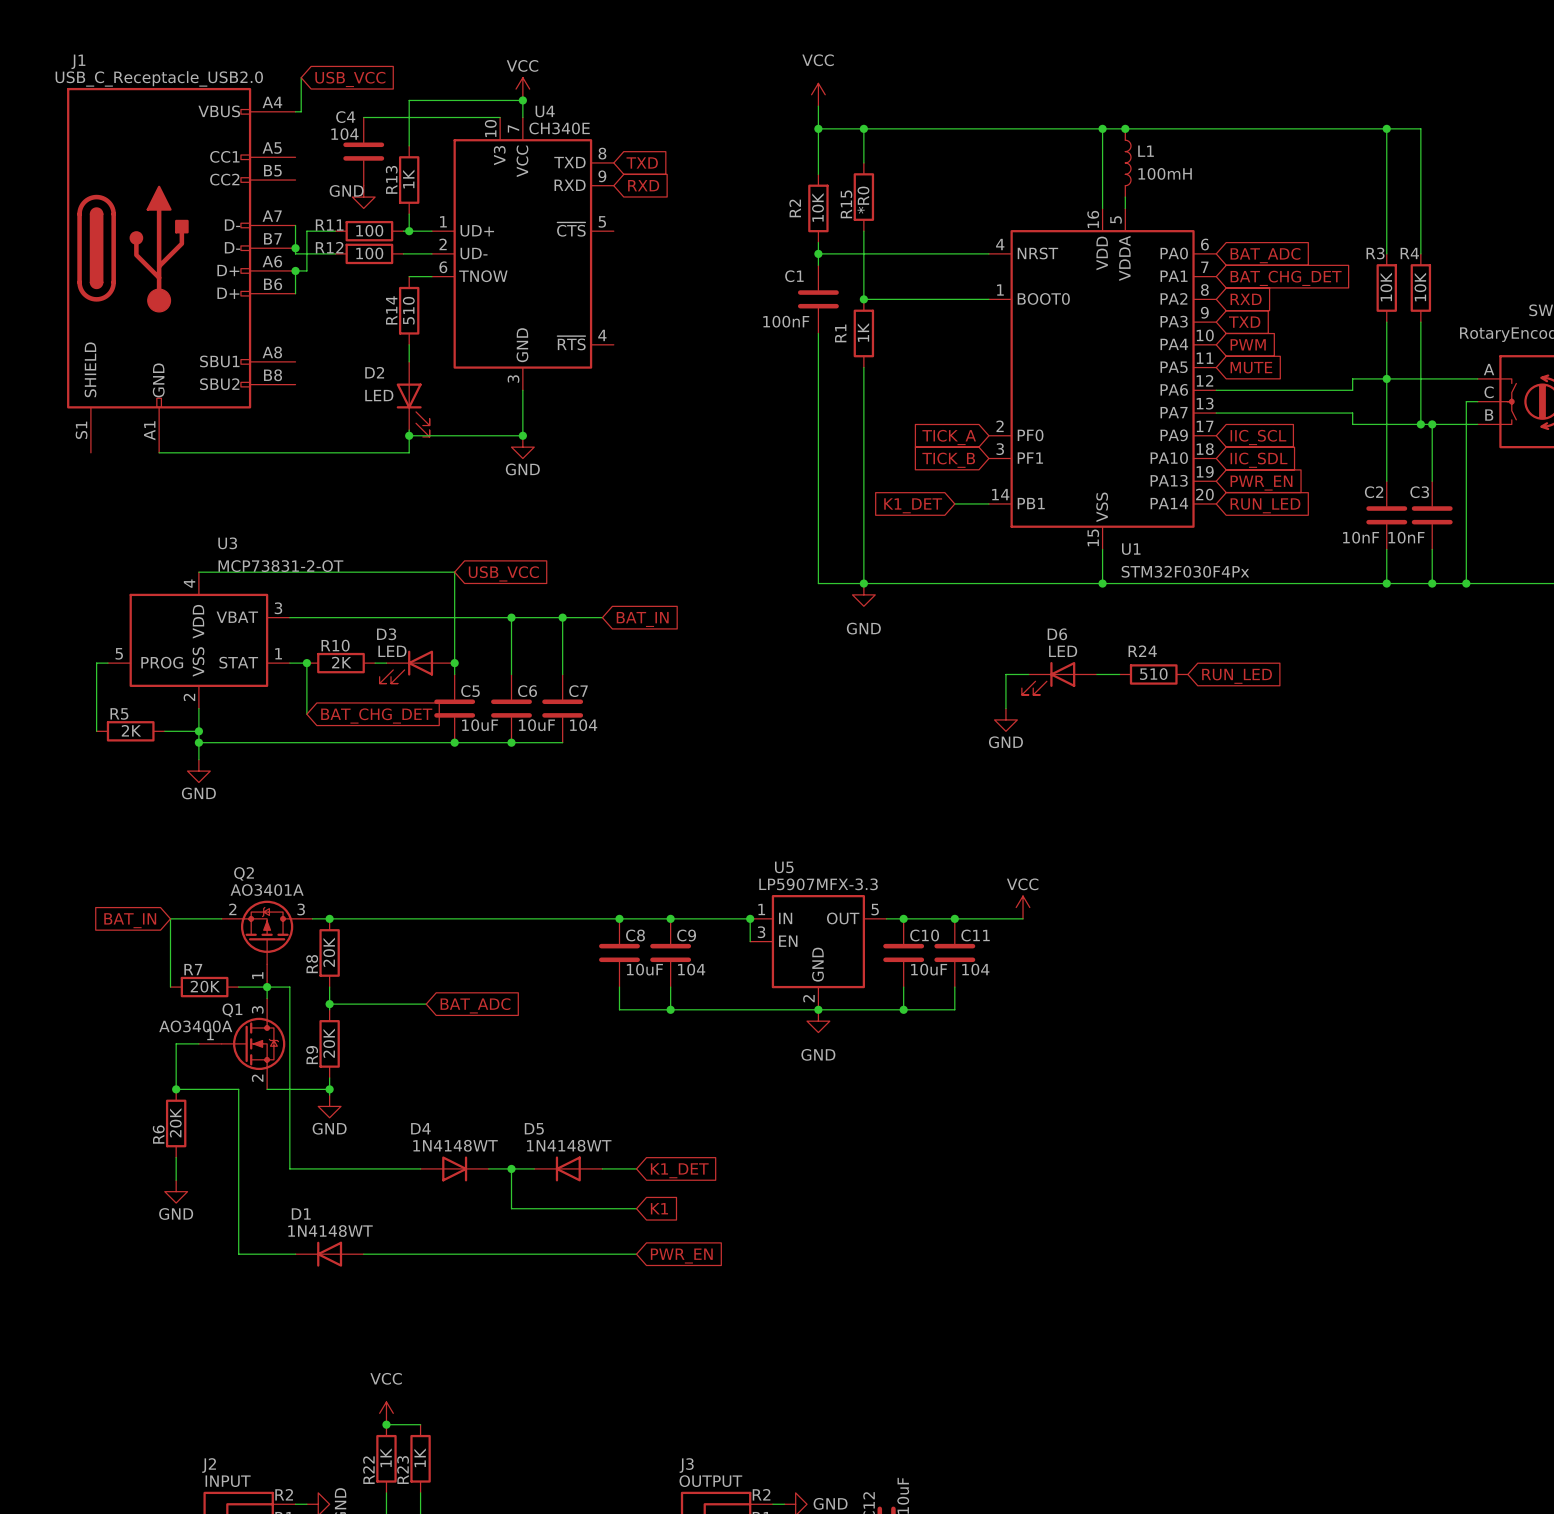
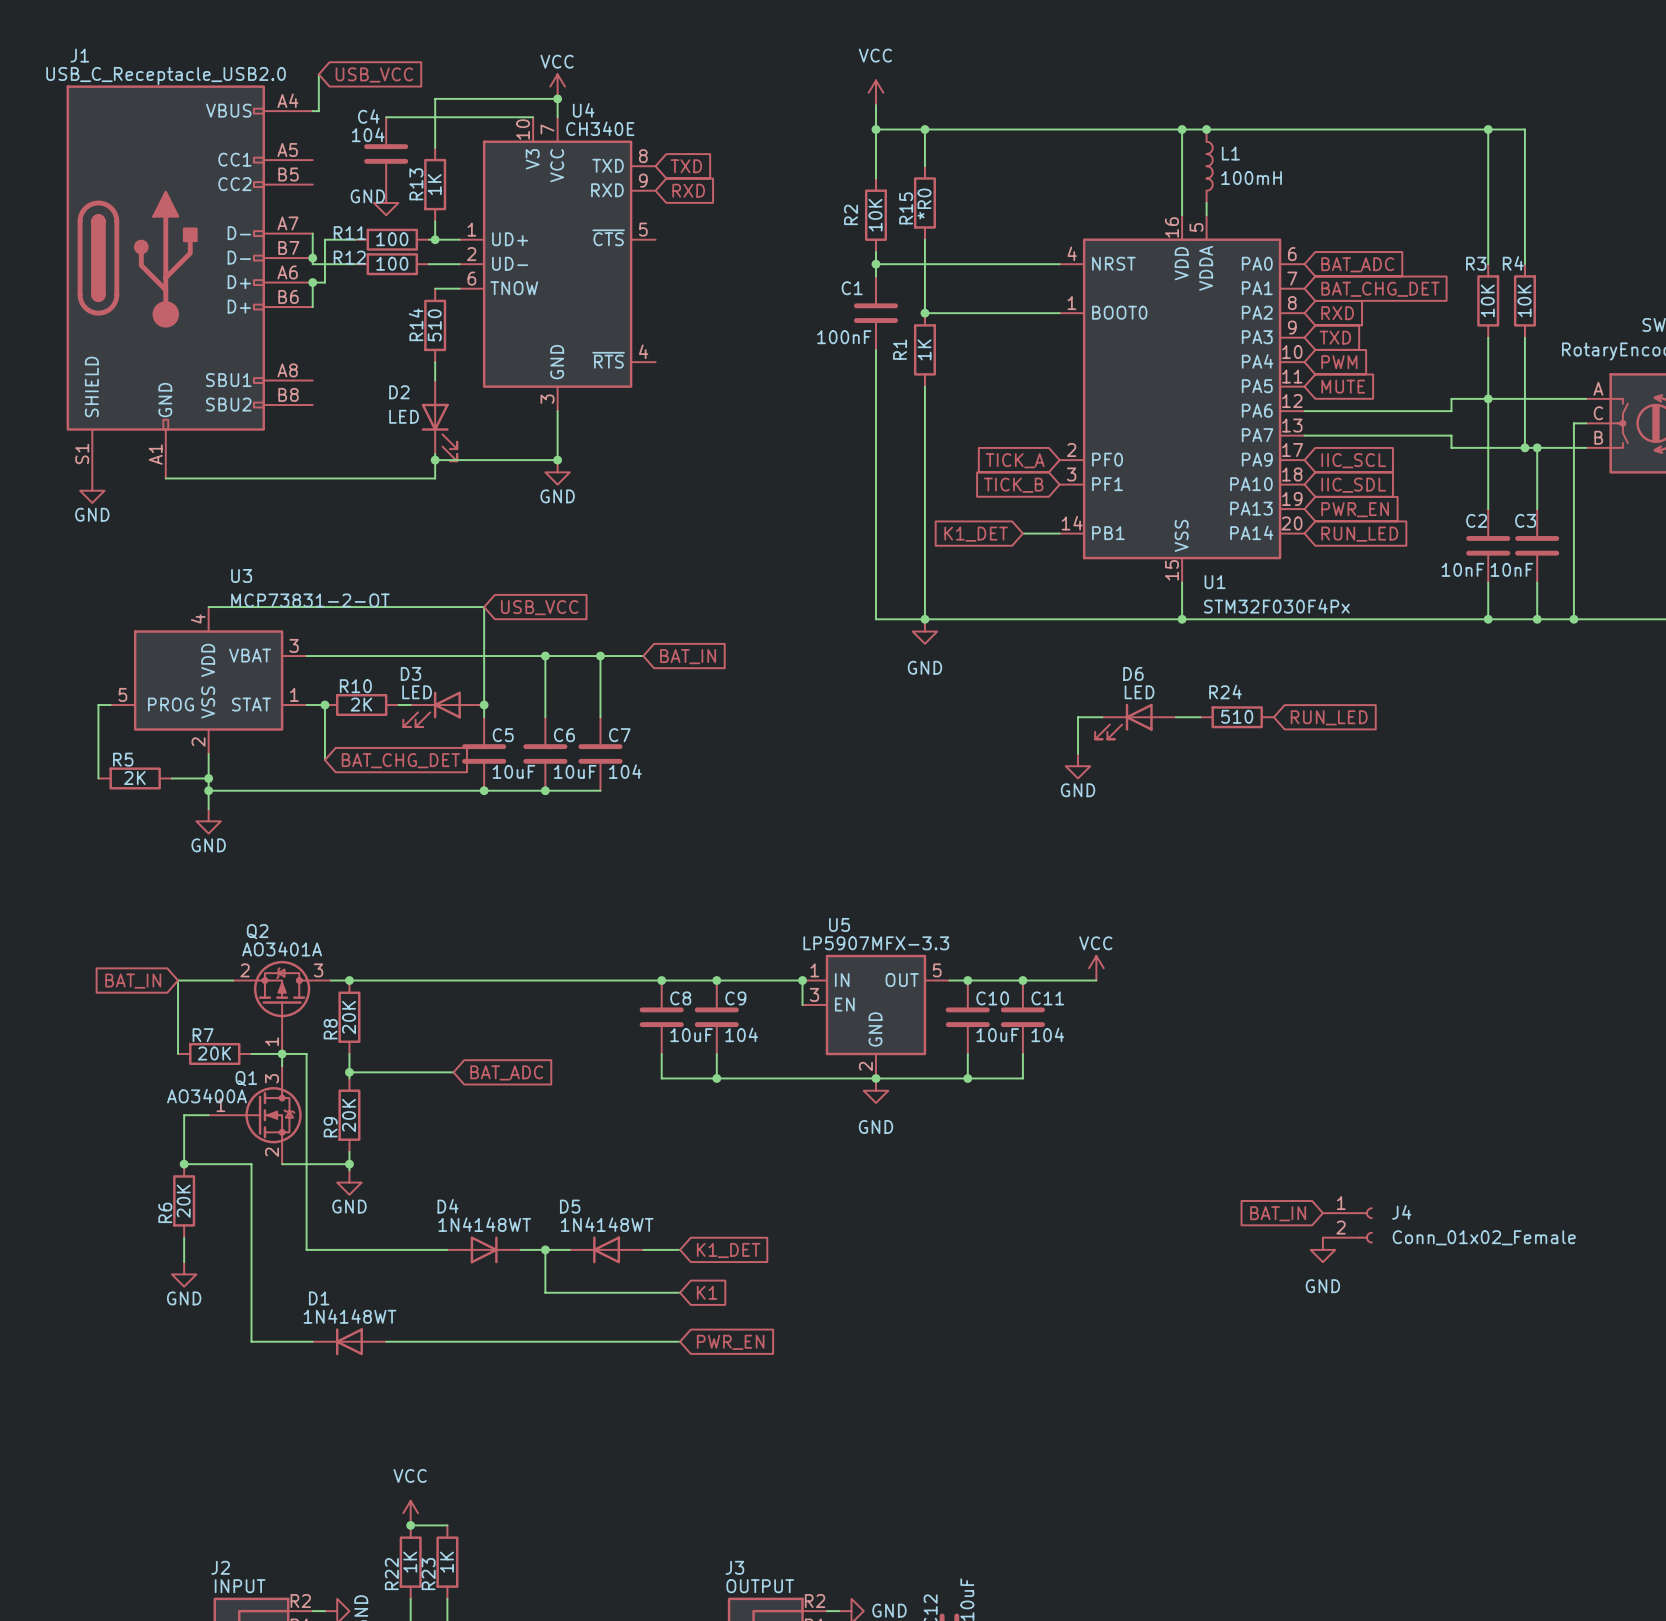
power symbol: none -> GND (92, 490)
global label: none -> BAT_IN (1278, 1213)
J4: none -> Conn_01x02_Female (1347, 1225)
power symbol: none -> GND (1322, 1249)

